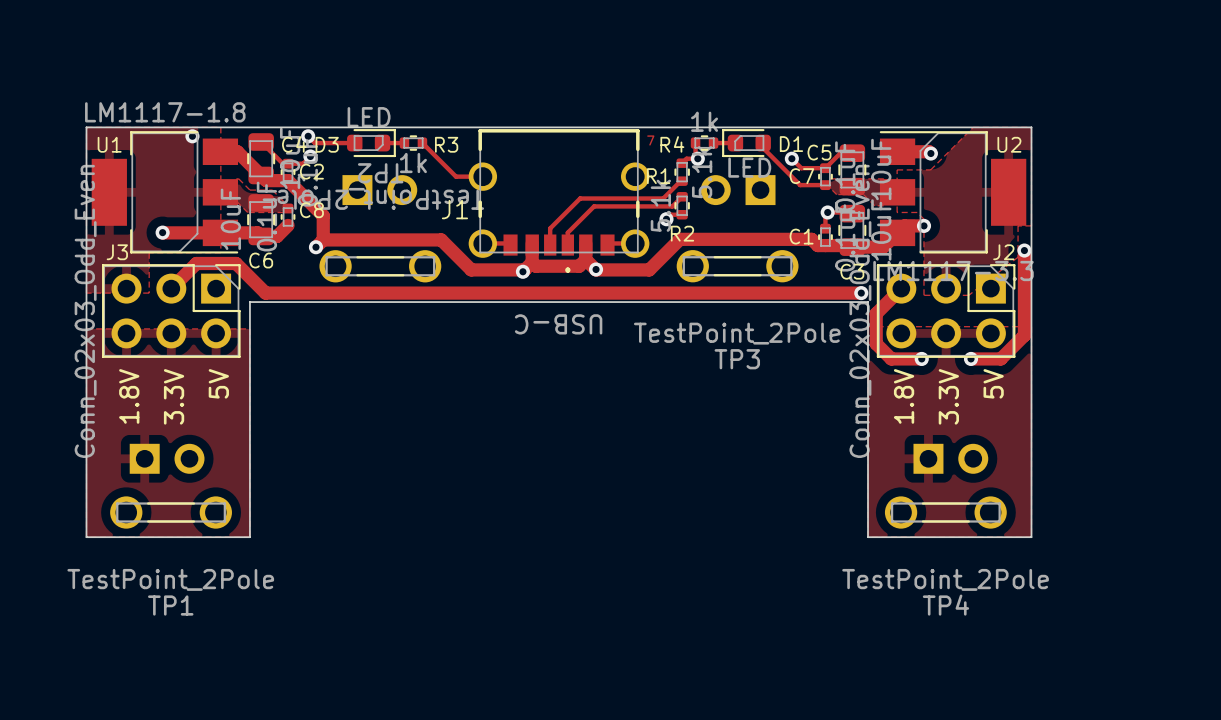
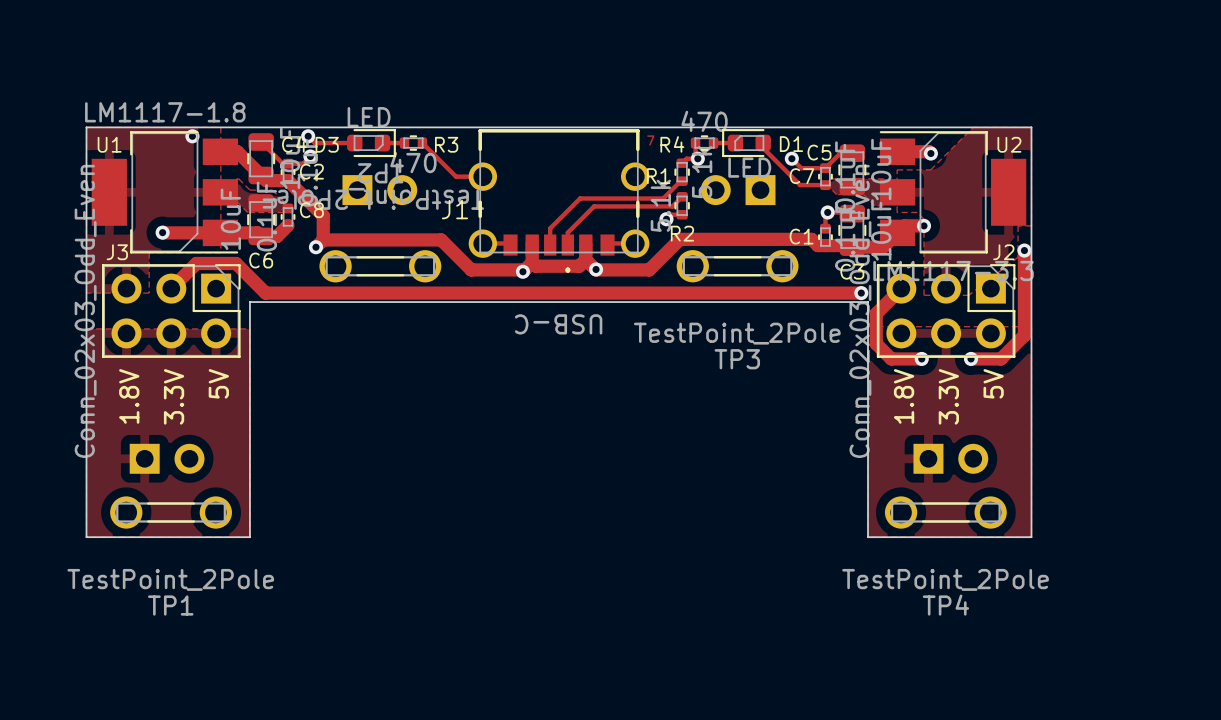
R4 value: 1k (704, 121) -> 470 (704, 121)
R3 value: 1k (413, 163) -> 470 (413, 162)

